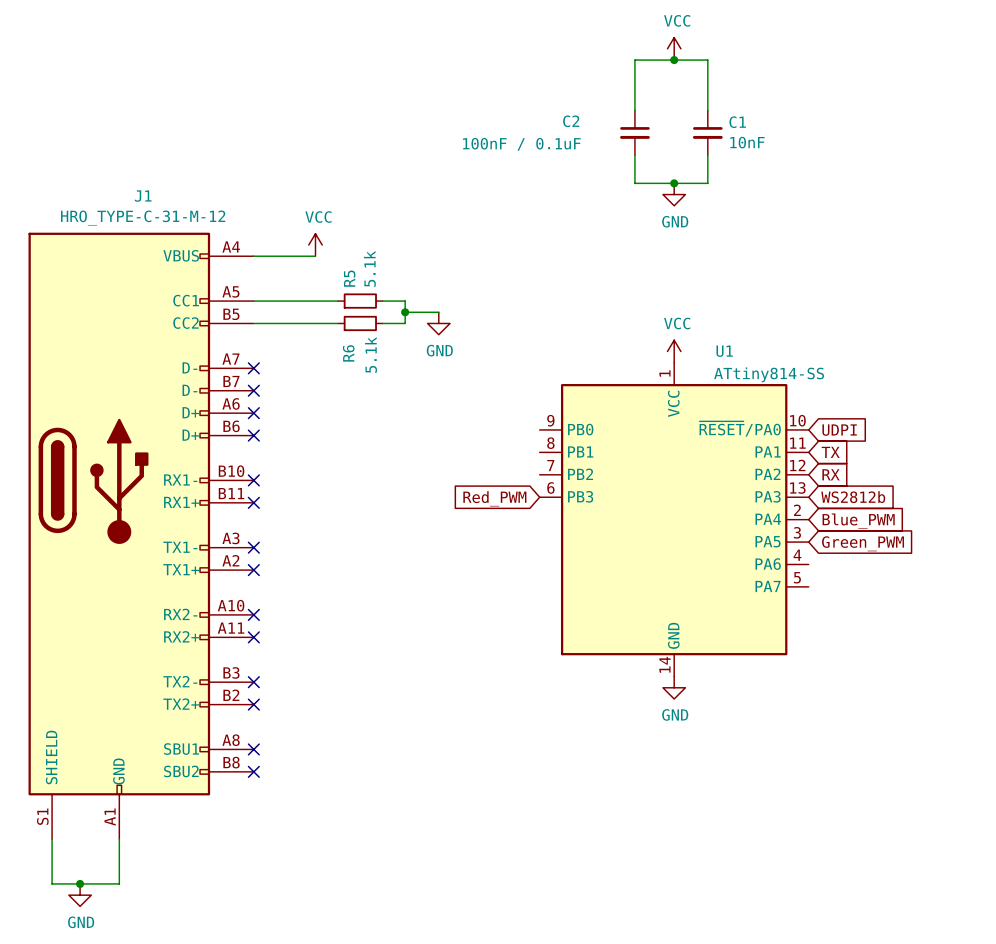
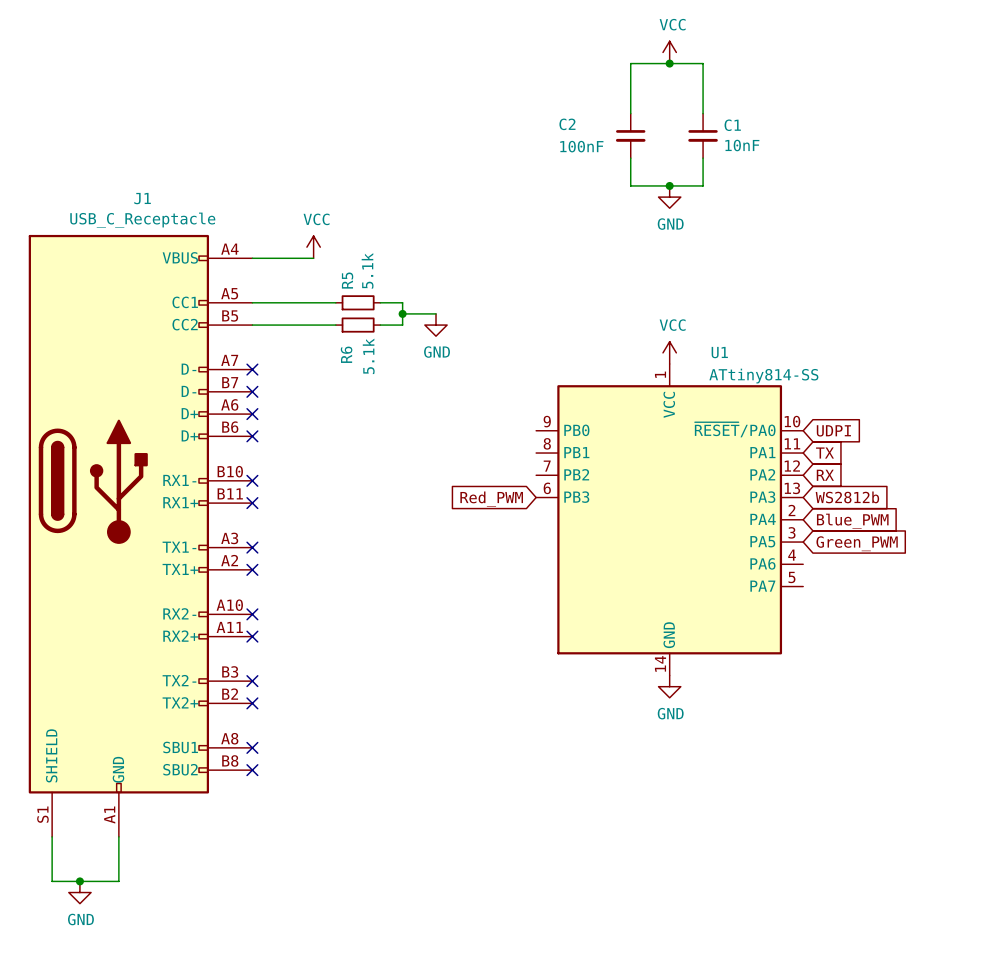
C2 value: 100nF / 0.1uF (521, 144) -> 100nF (581, 146)
J1 value: HRO_TYPE-C-31-M-12 (143, 218) -> USB_C_Receptacle (142, 220)

